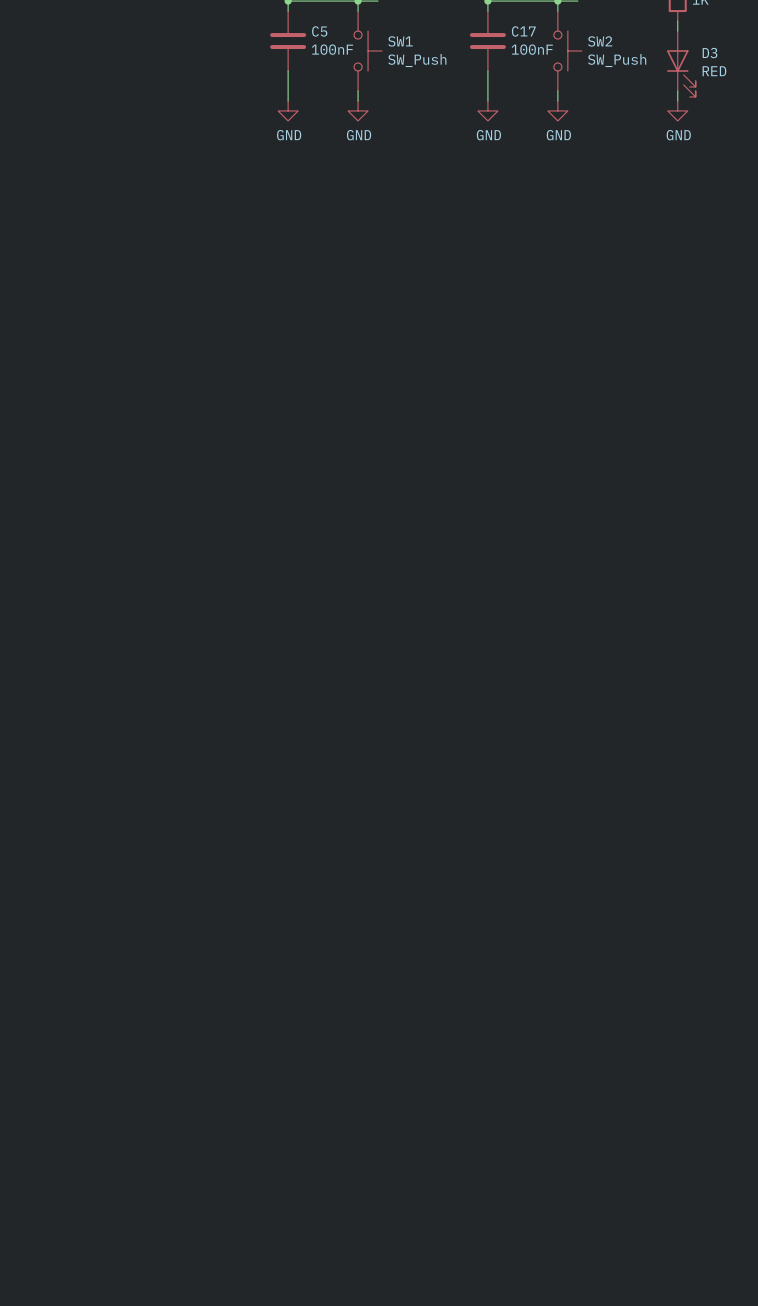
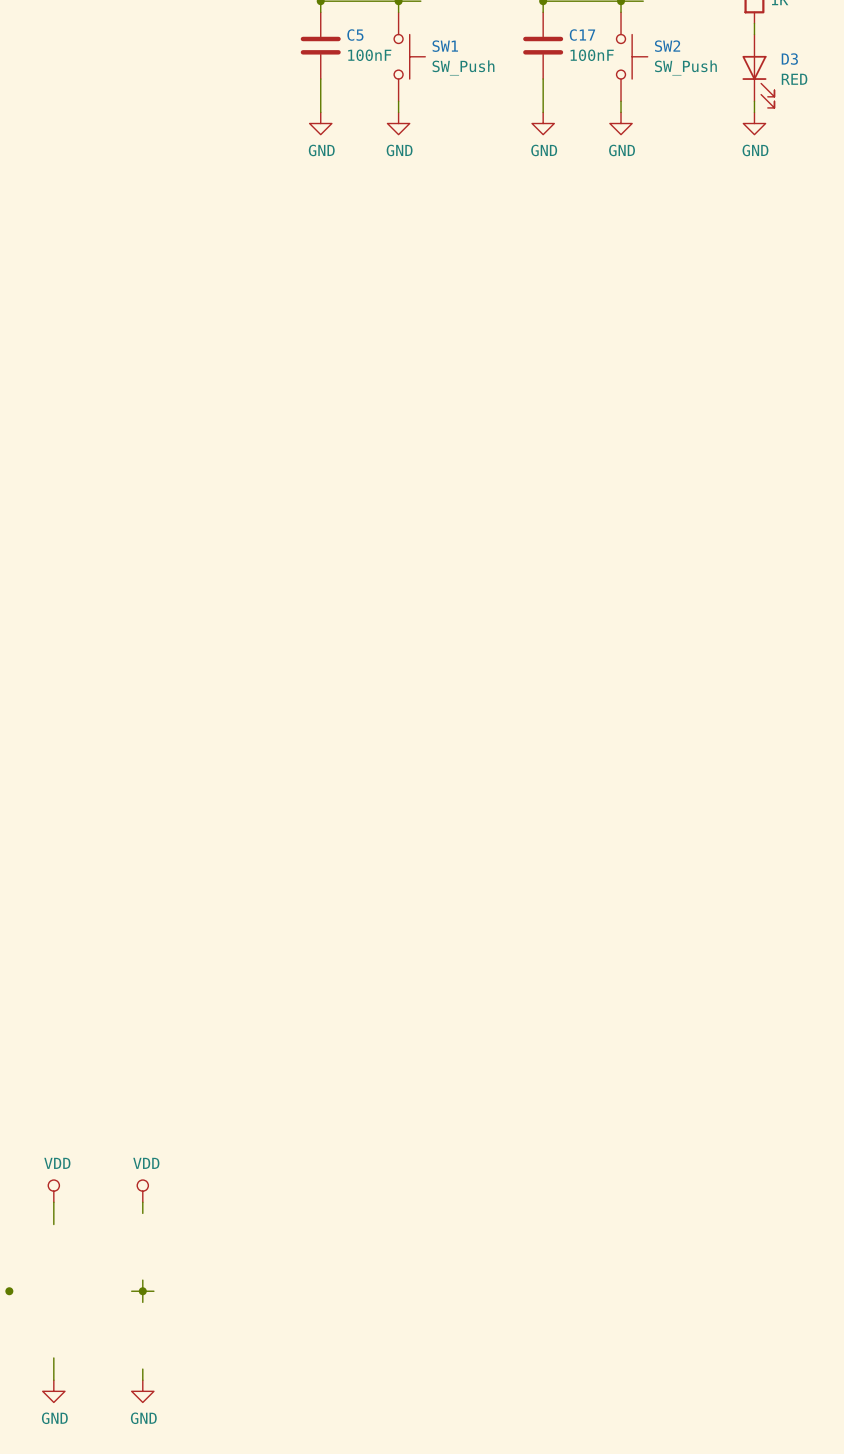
power symbol: none -> VDD (53, 1191)
power symbol: none -> VDD (142, 1191)
wire: none -> (53, 1202) (53, 1224)
wire: none -> (142, 1202) (142, 1213)
wire: none -> (142, 1280) (142, 1302)
junction: none -> (9, 1291)
wire: none -> (131, 1291) (153, 1291)
junction: none -> (142, 1291)
wire: none -> (53, 1357) (53, 1380)
wire: none -> (142, 1369) (142, 1380)
power symbol: none -> GND (53, 1391)
power symbol: none -> GND (142, 1391)

